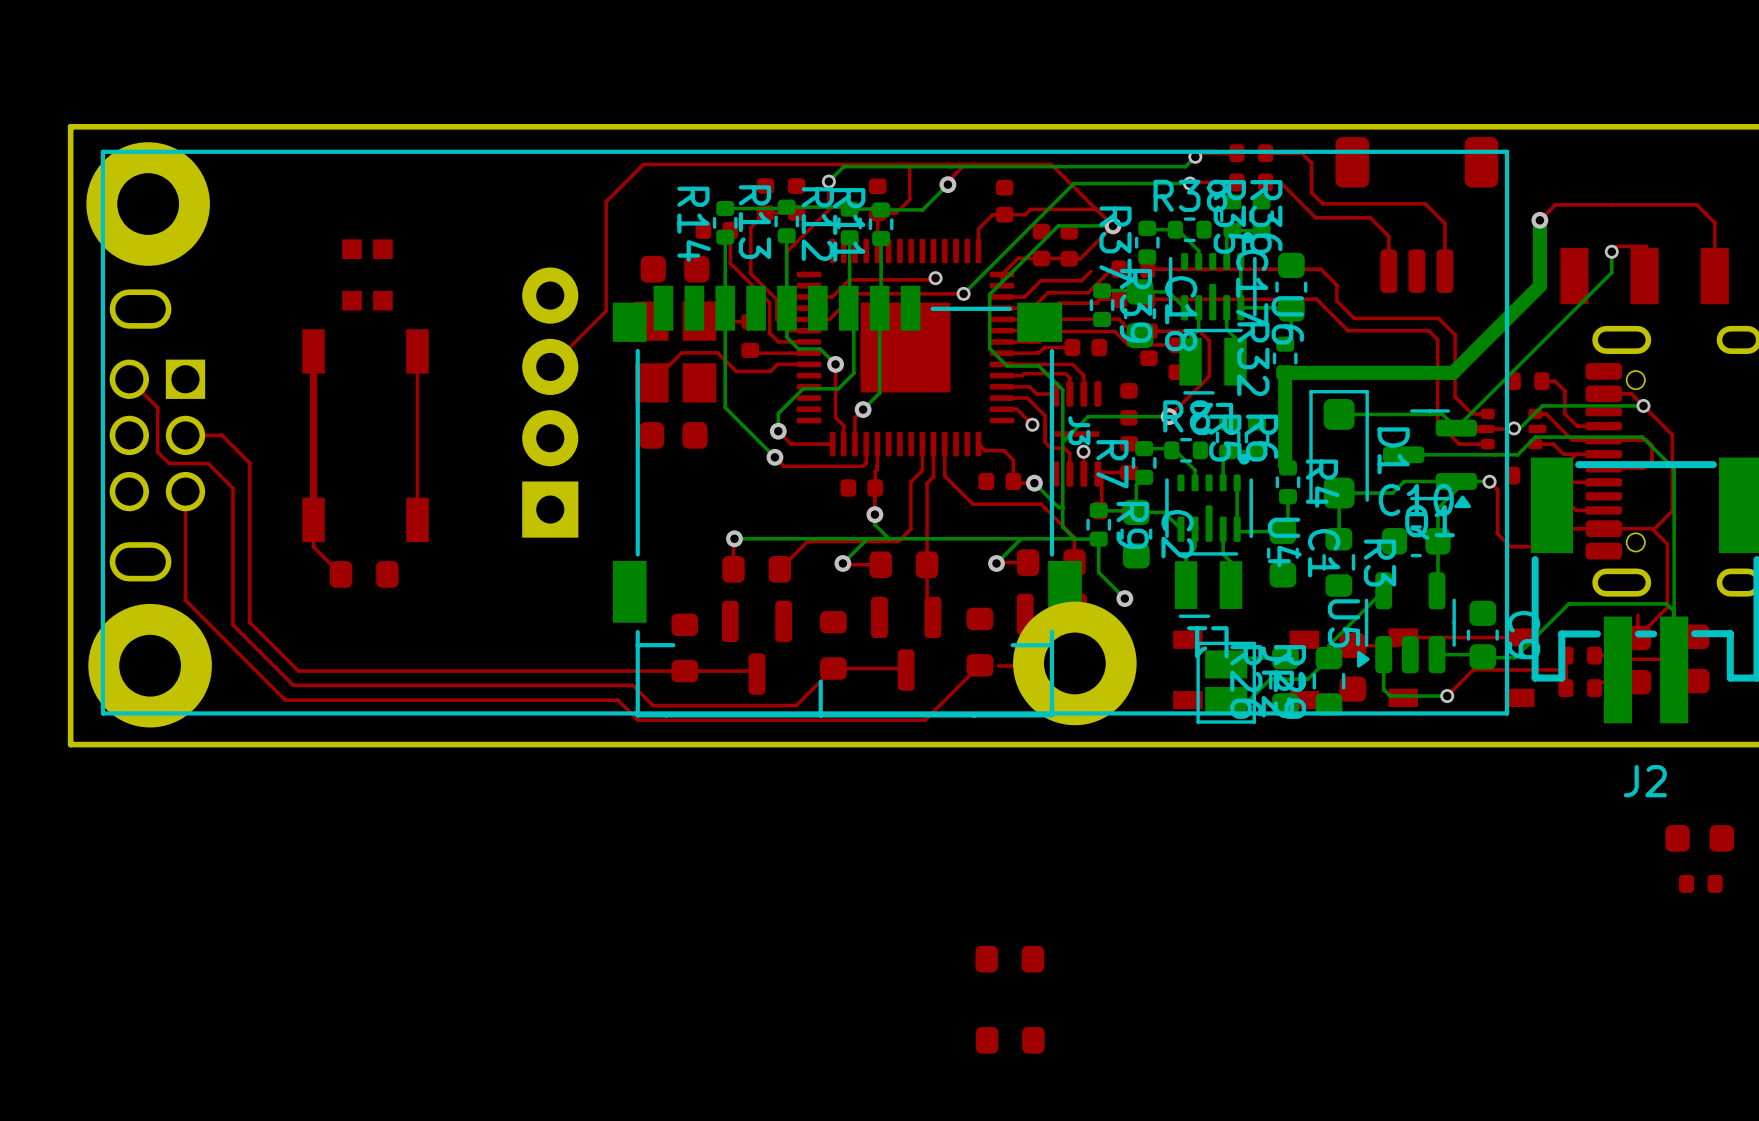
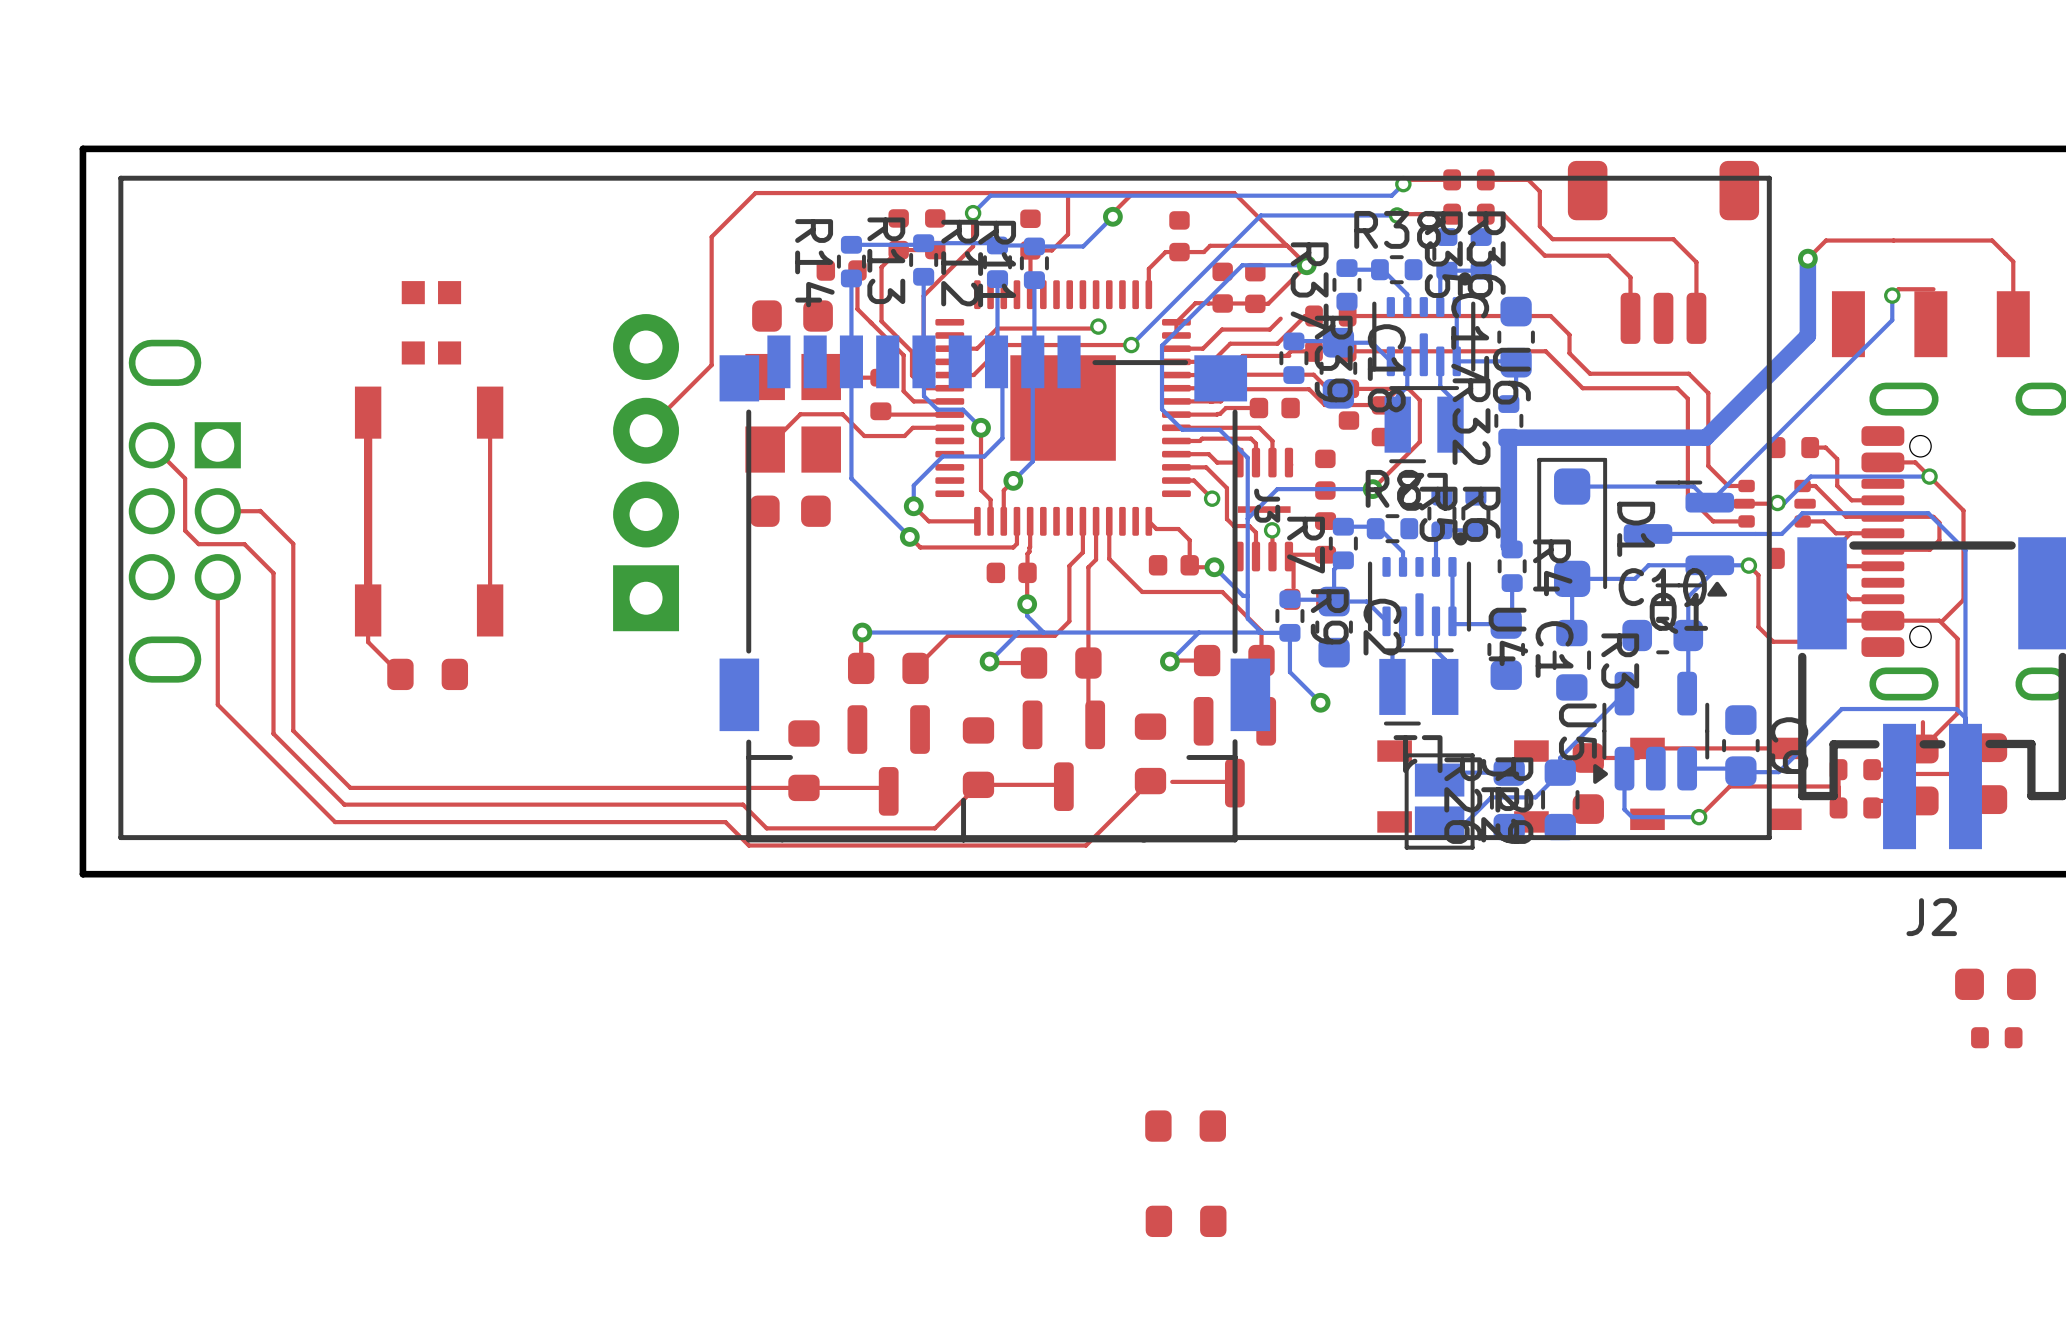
part: (148, 204) -> none
part: (1074, 663) -> none
part: (150, 665) -> none

